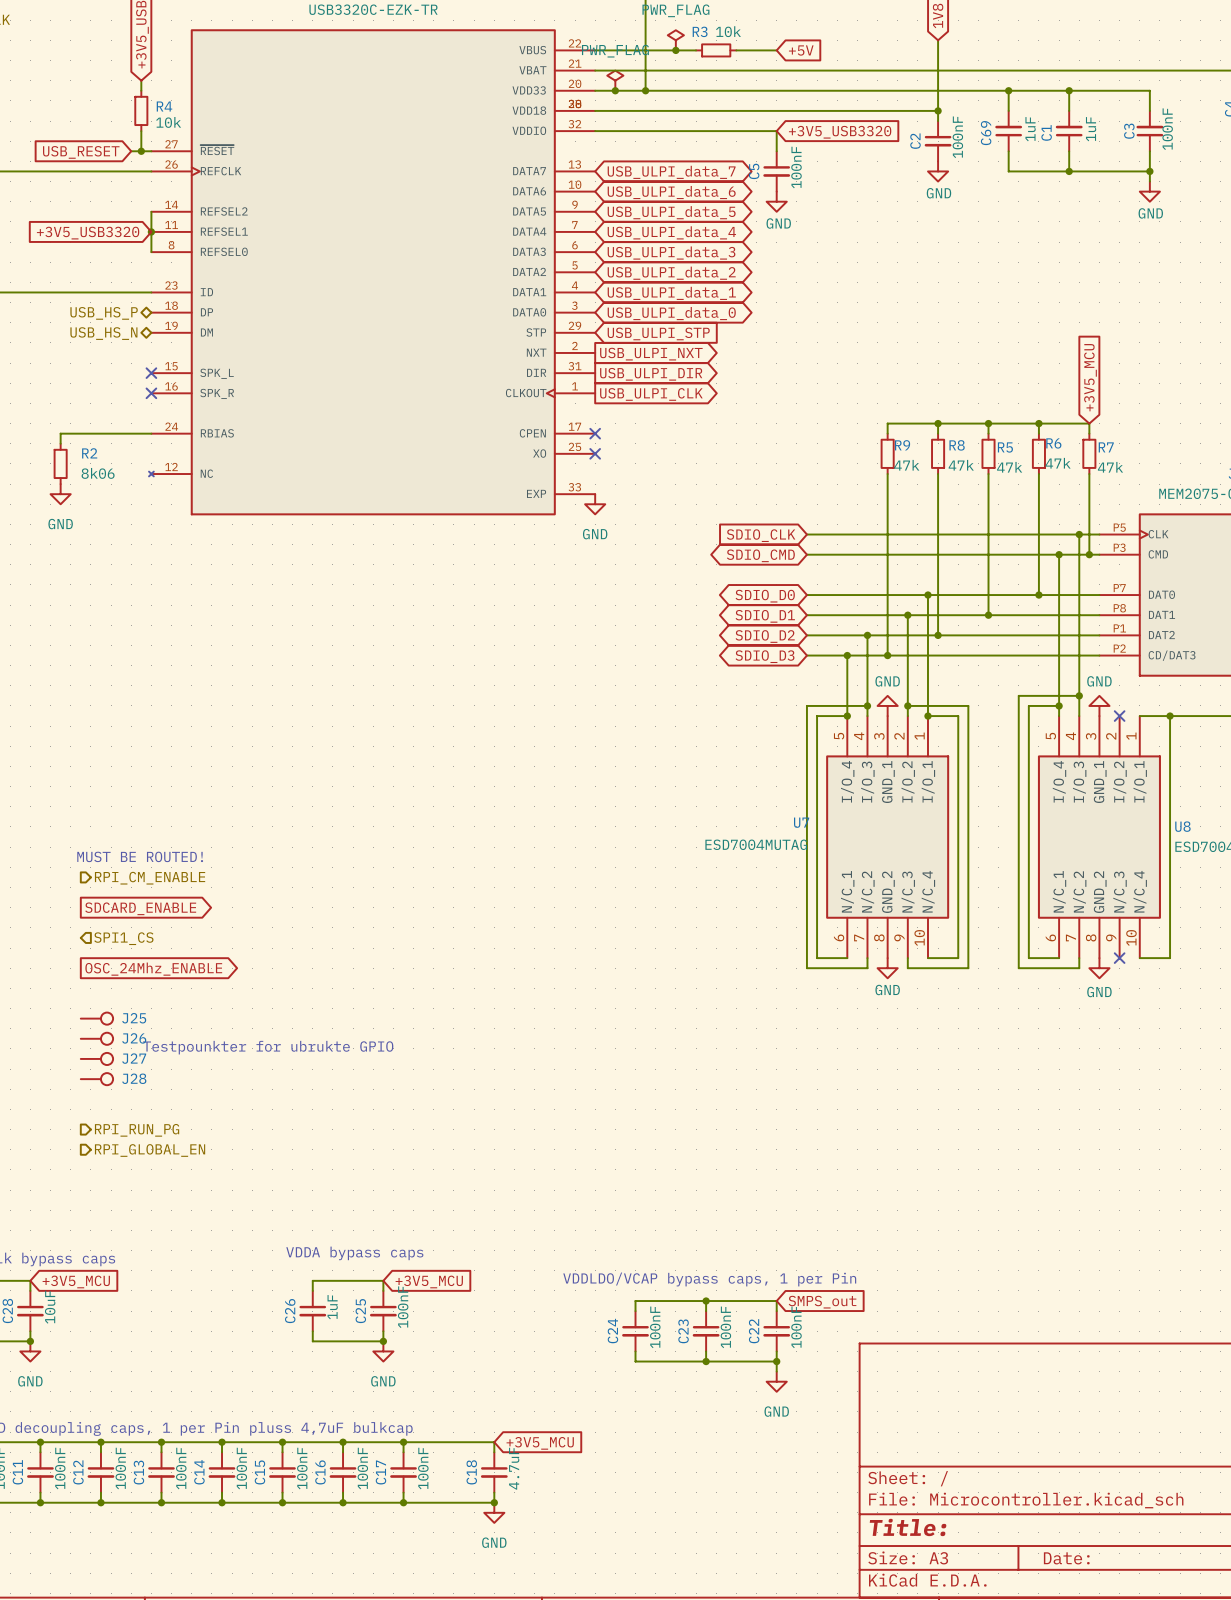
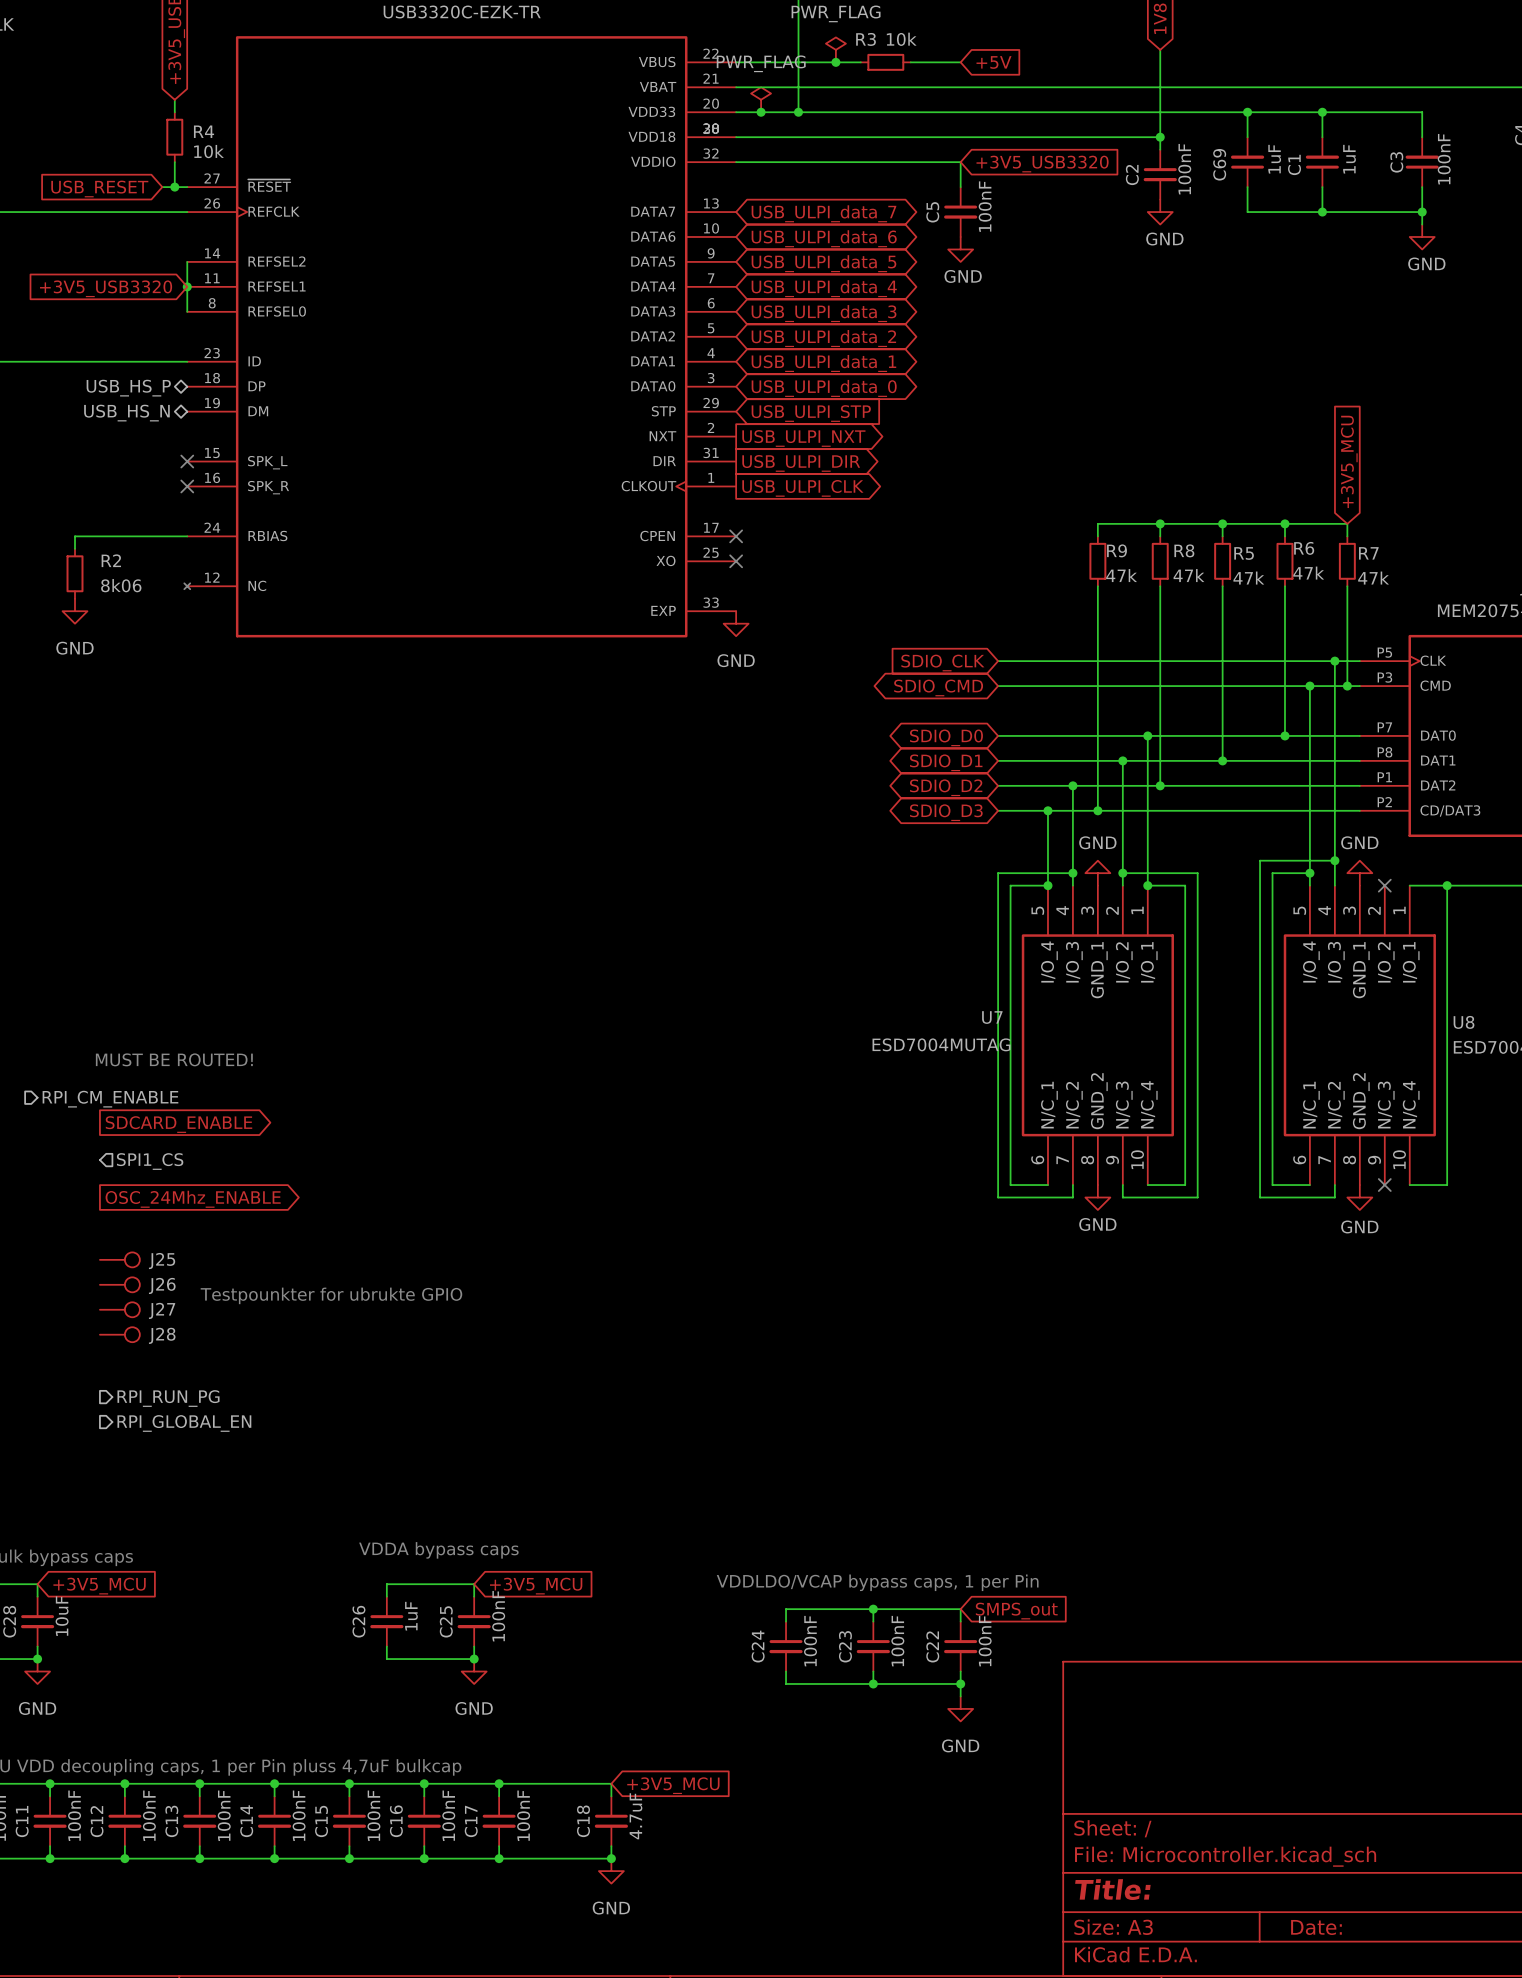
hierarchical label position: RPI_CM_ENABLE (150, 878) -> RPI_CM_ENABLE (110, 1099)

